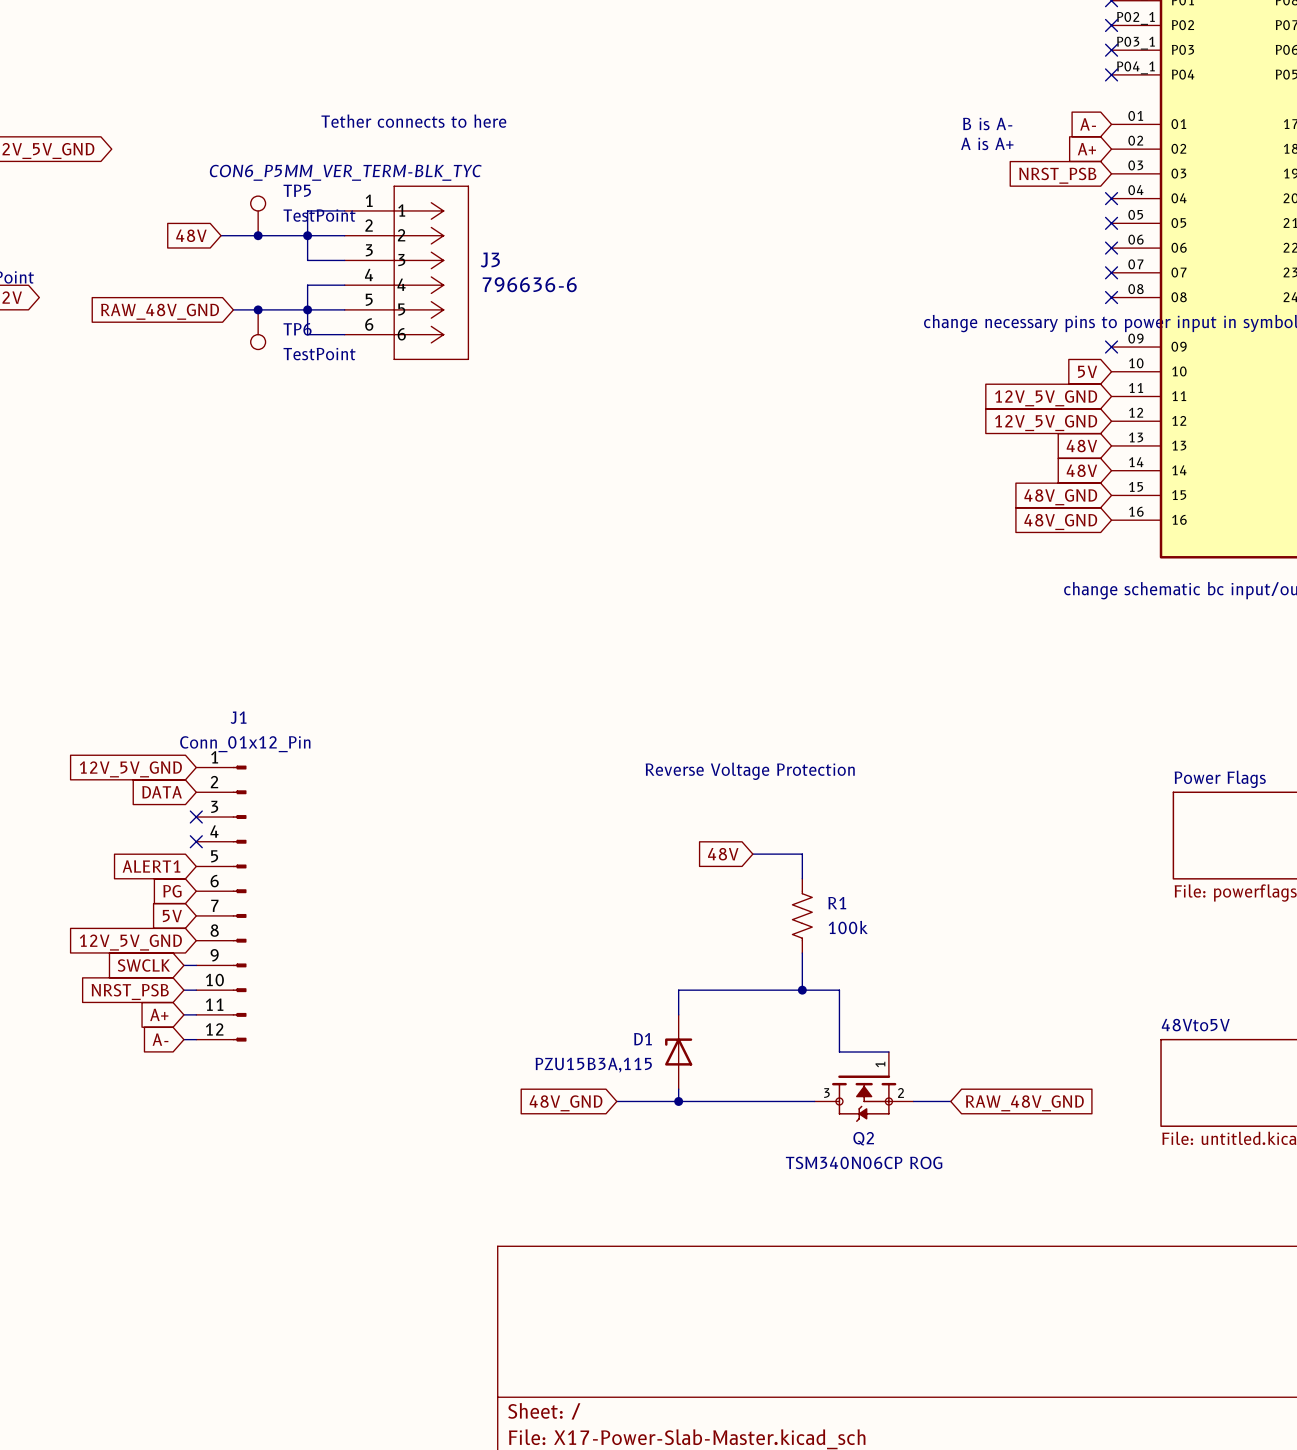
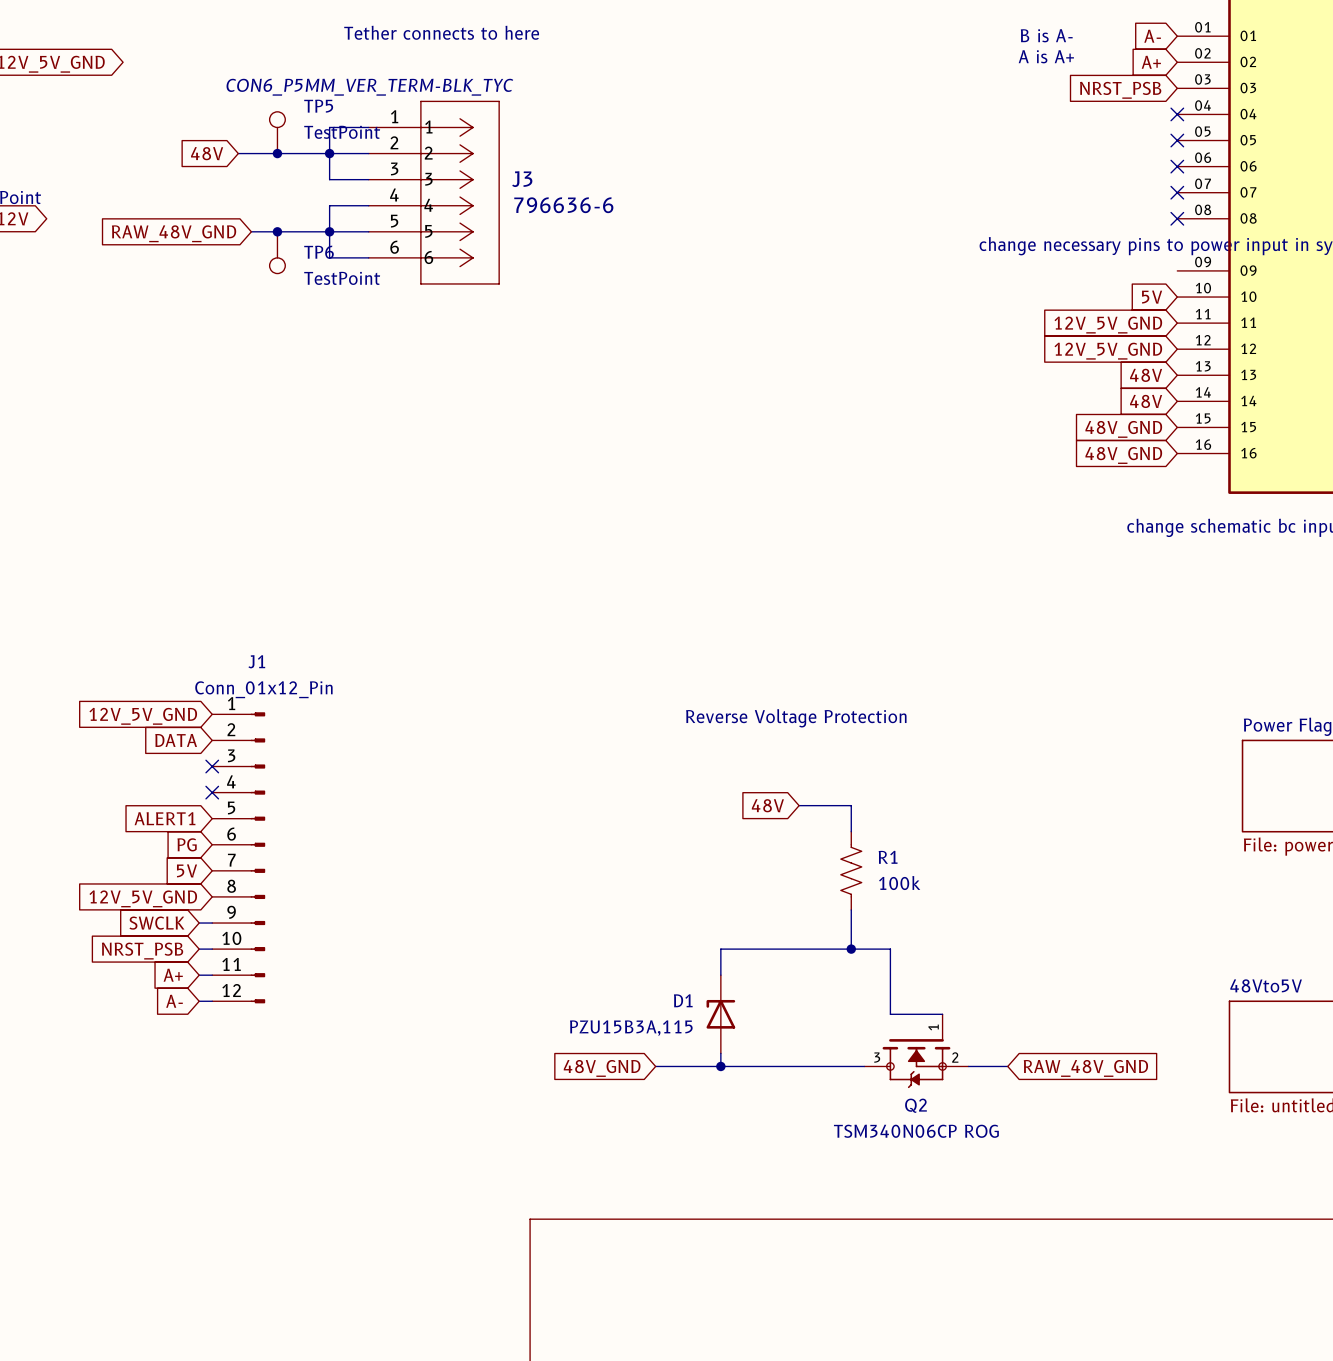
no-connect mark: (1111, 347) -> none

